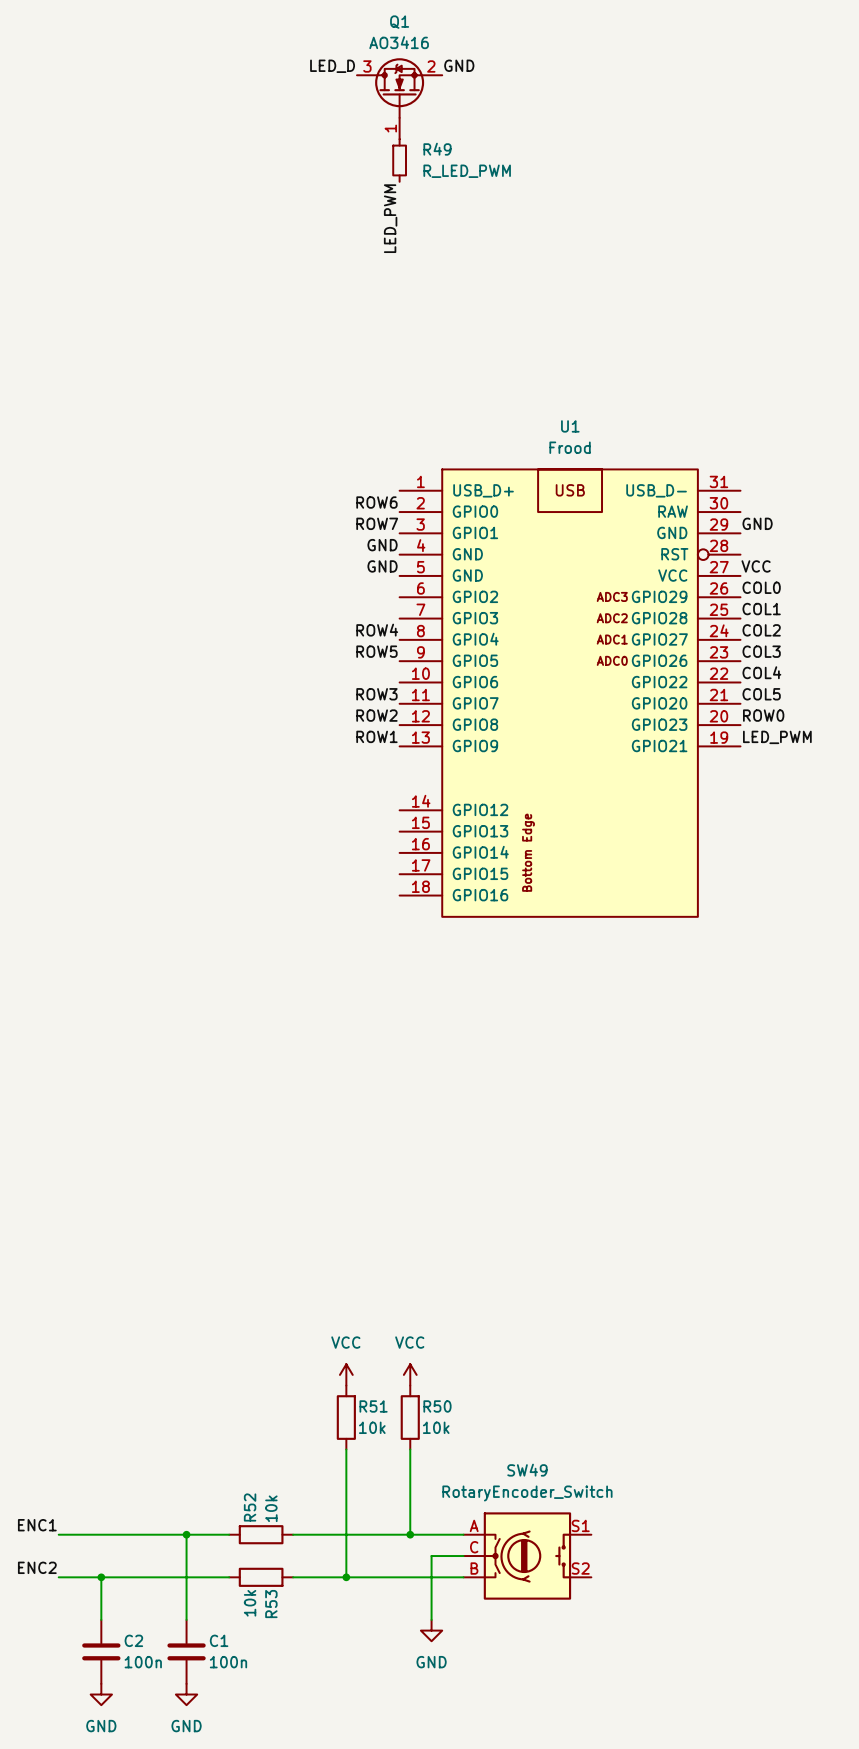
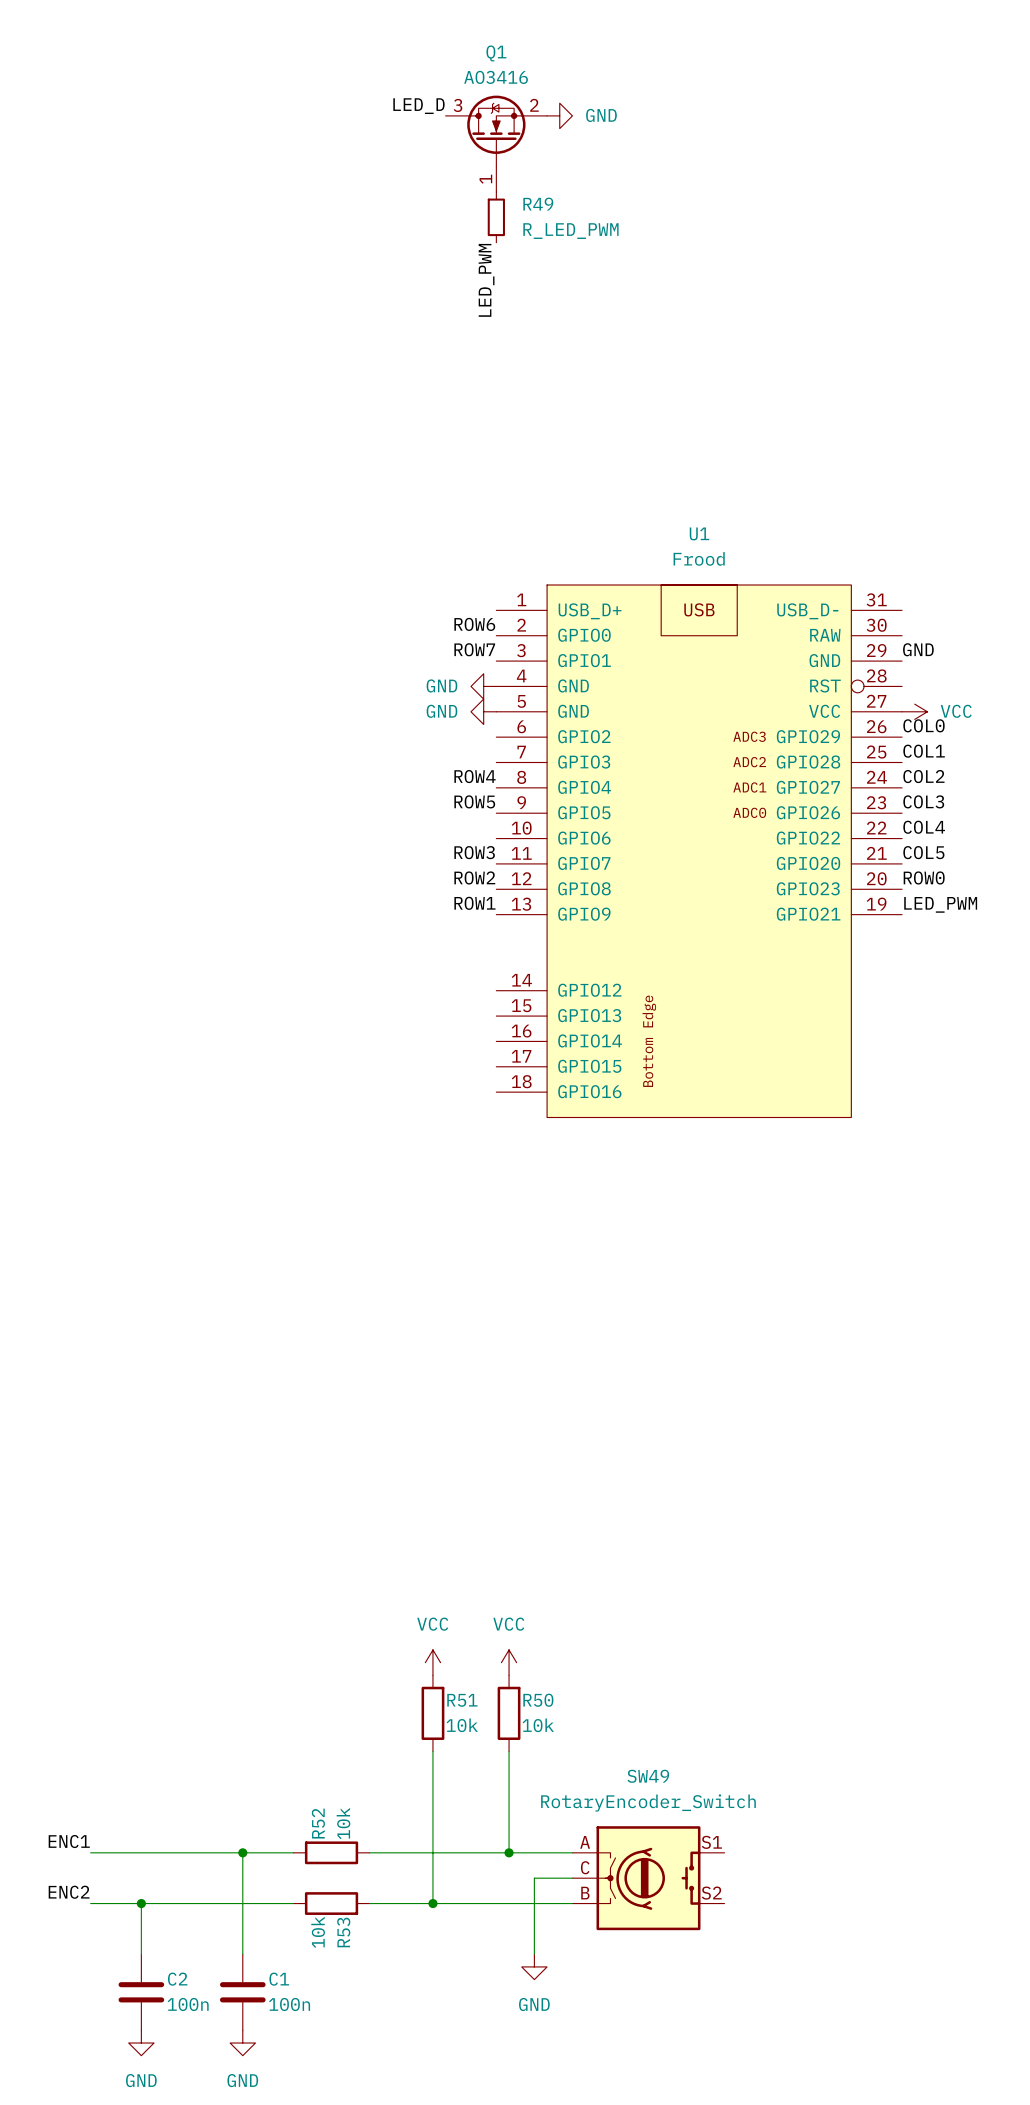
label: GND (459, 65) -> none
power symbol: none -> GND (559, 115)
label: GND (382, 545) -> none
power symbol: none -> GND (483, 686)
label: GND (382, 566) -> none
label: VCC (756, 566) -> none
power symbol: none -> GND (483, 711)
power symbol: none -> VCC (914, 711)

